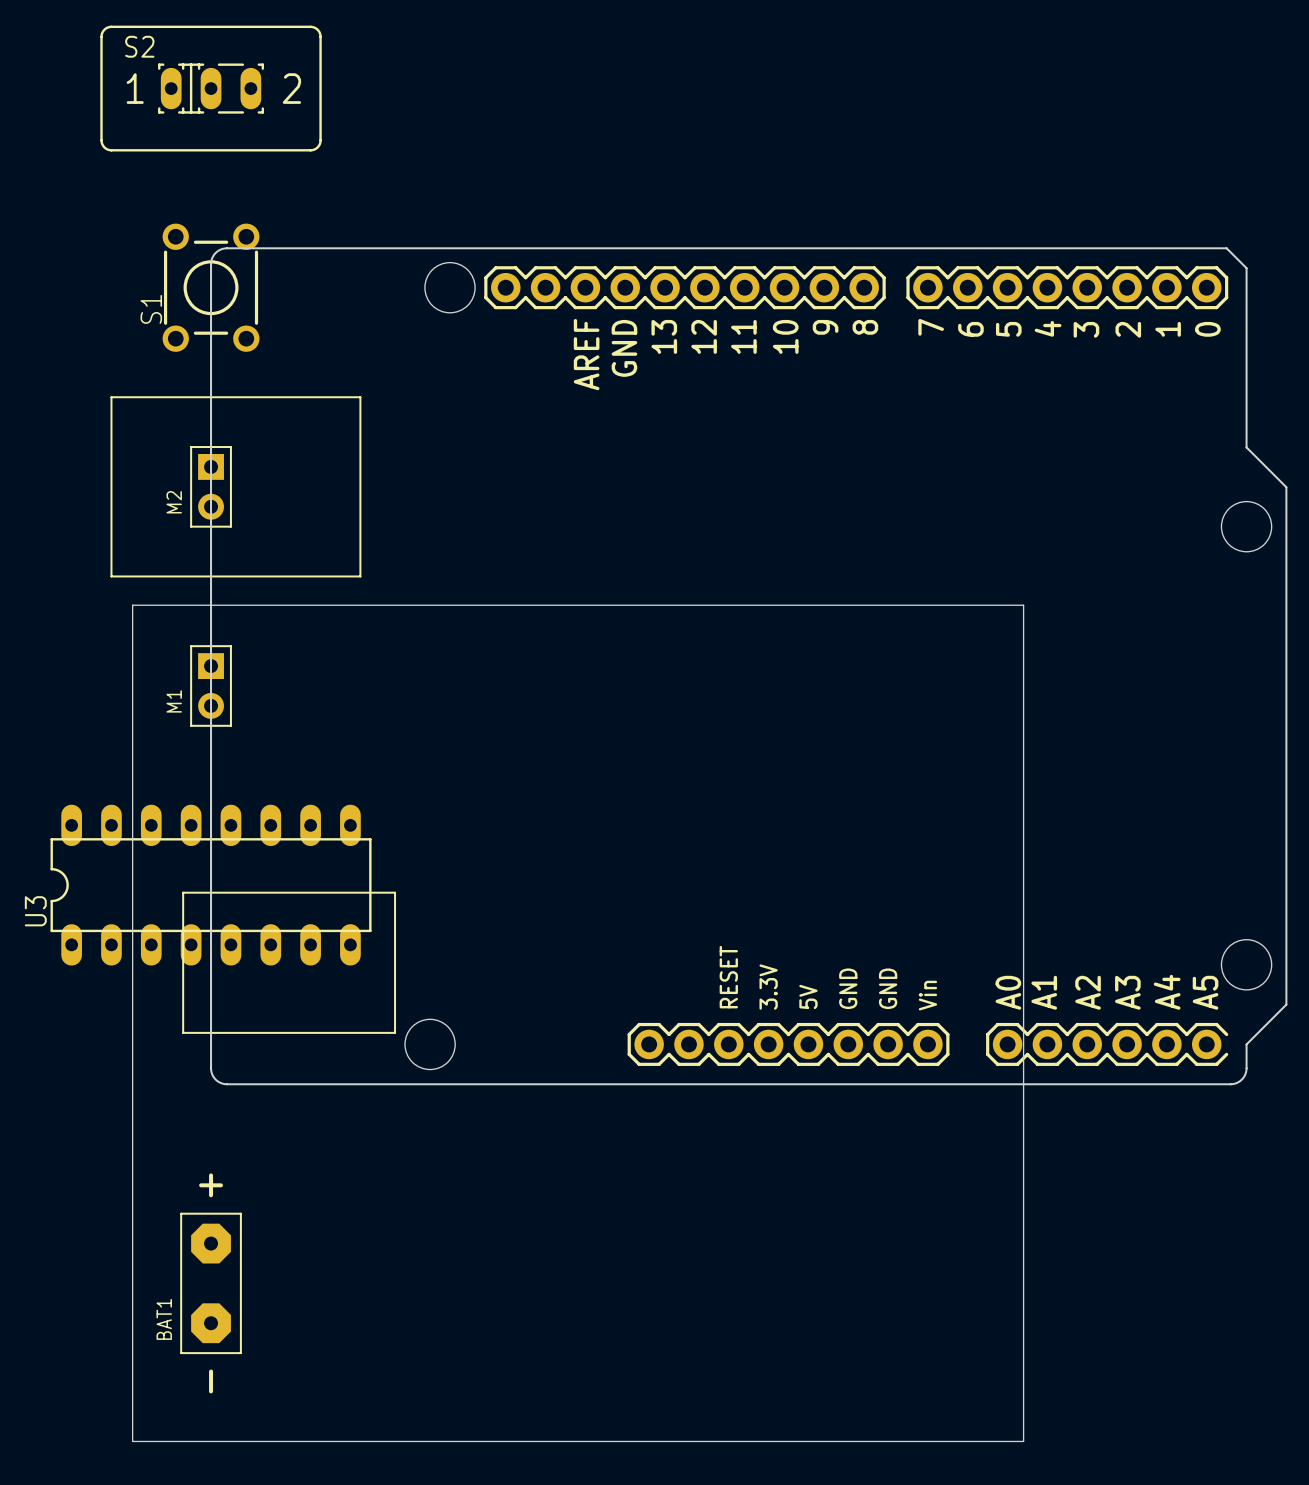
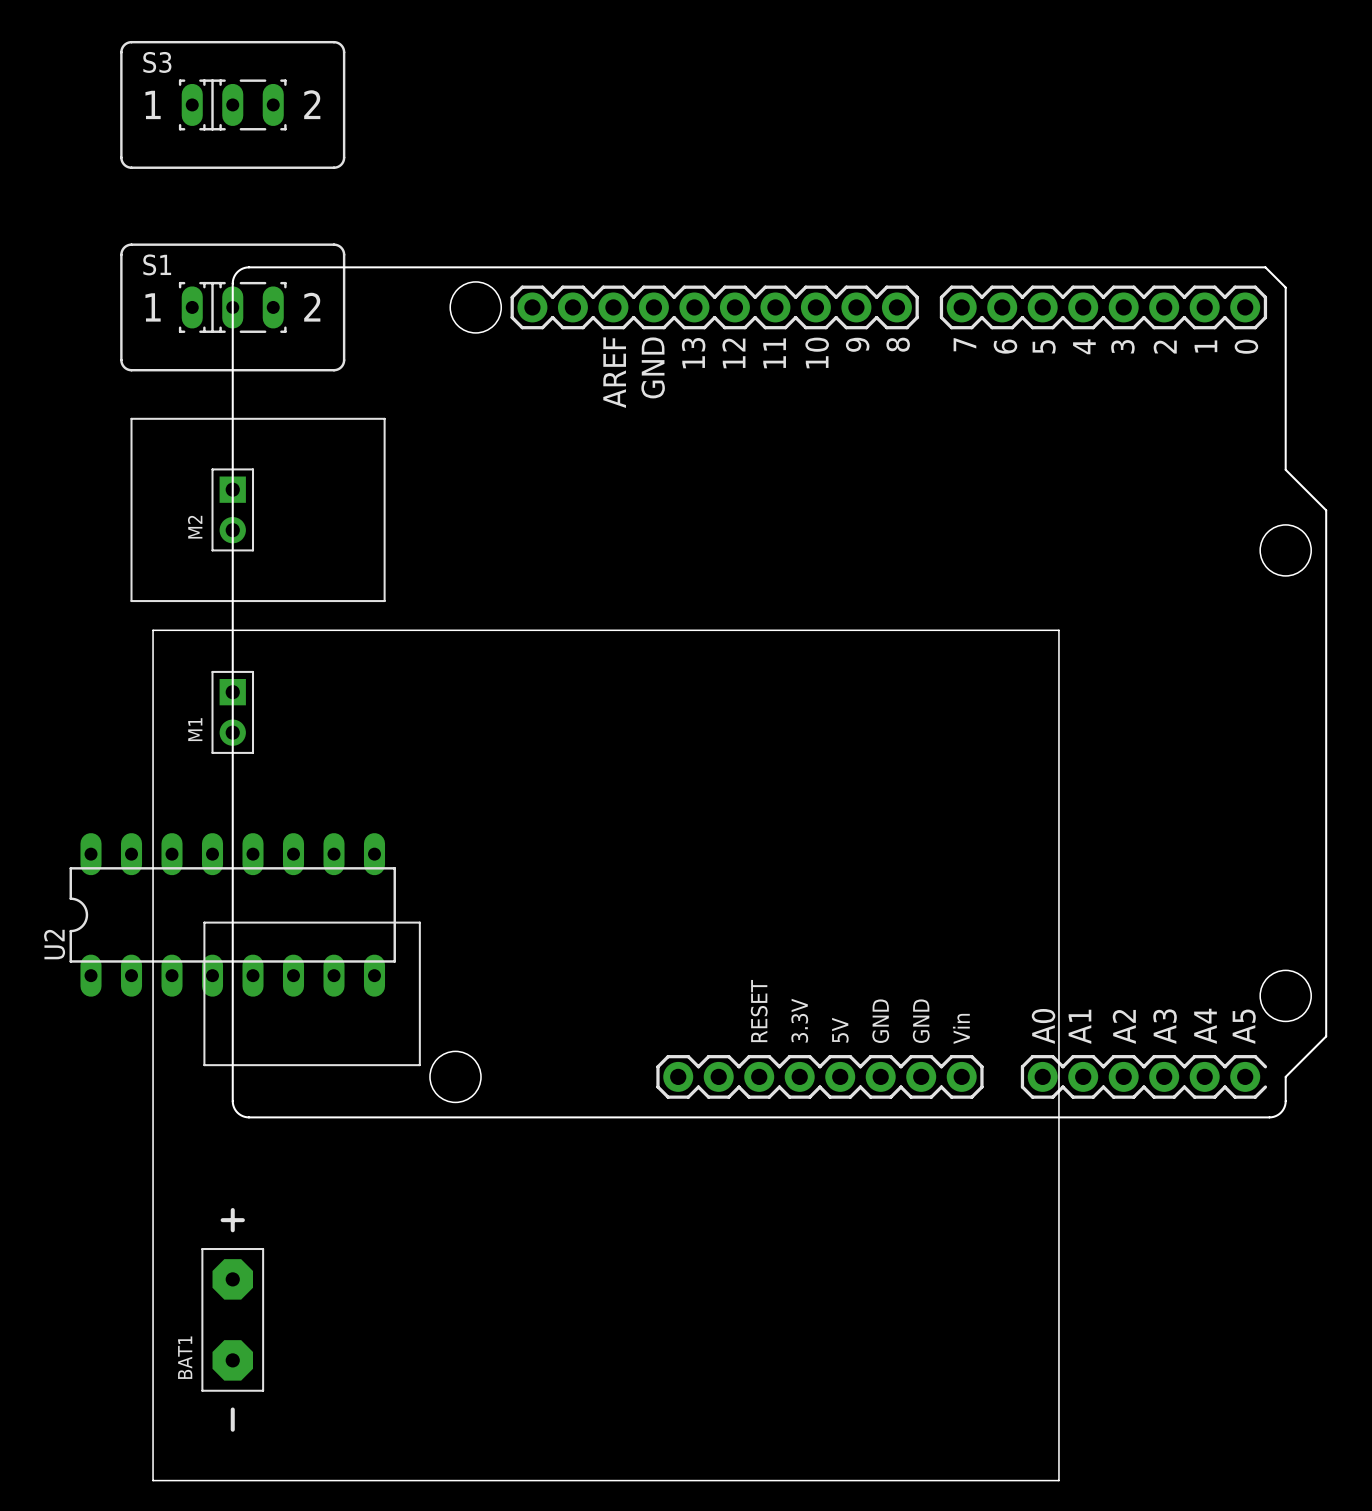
S2 name: S2 (139, 46) -> S3 (157, 62)
S1 footprint: [162, 223, 260, 352] -> [120, 243, 346, 372]
S1 name position: S1 (151, 309) -> S1 (157, 264)
U3 name: U3 (35, 911) -> U2 (54, 944)

